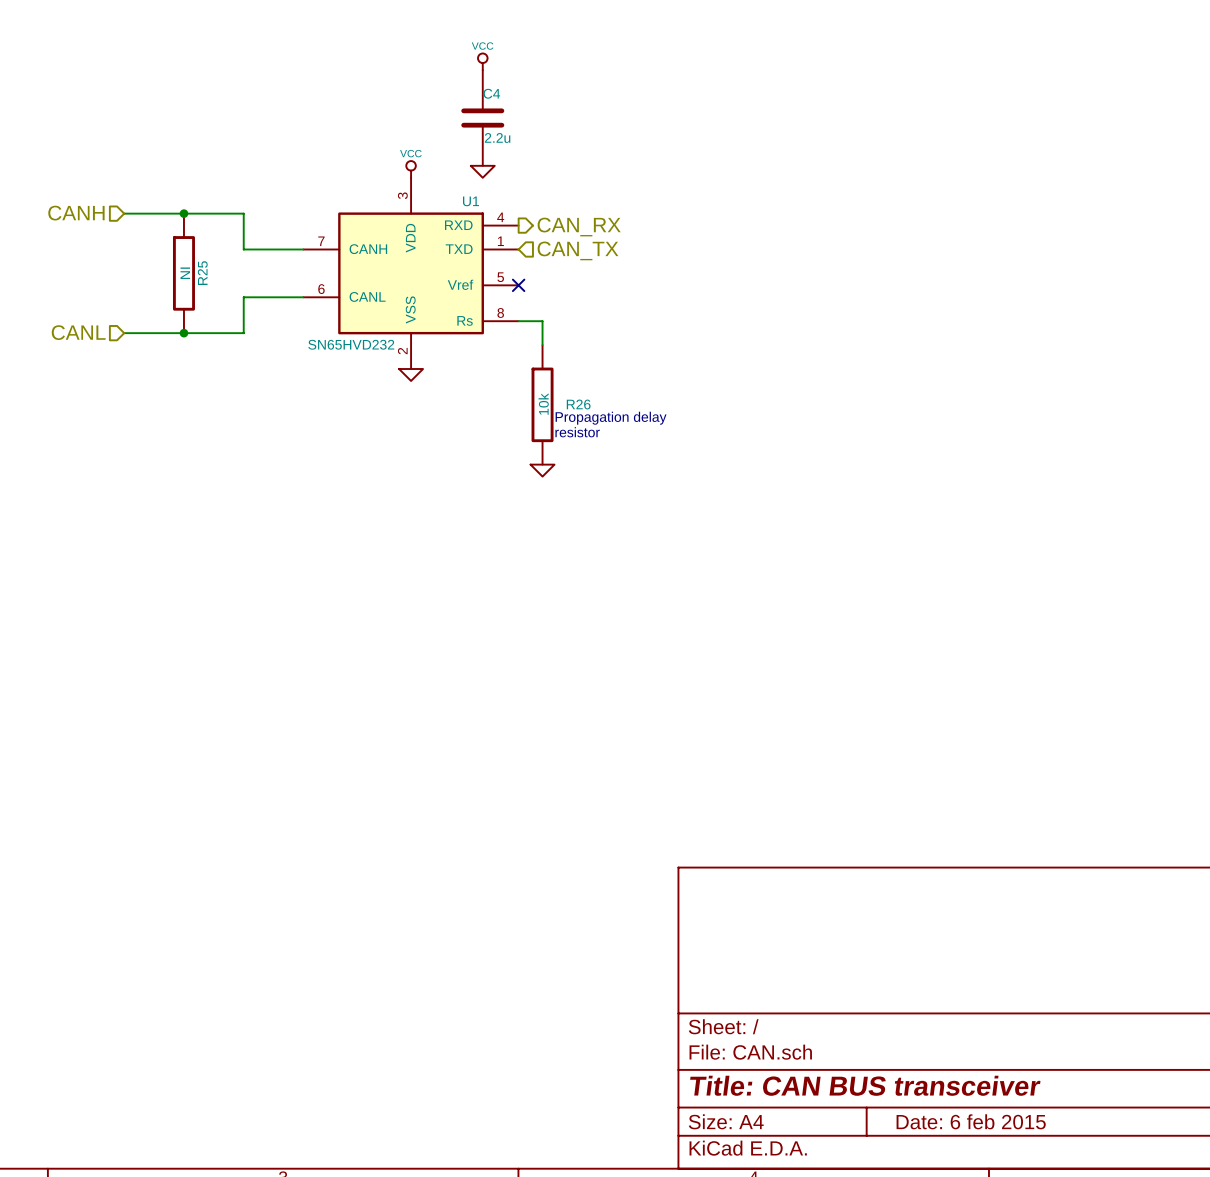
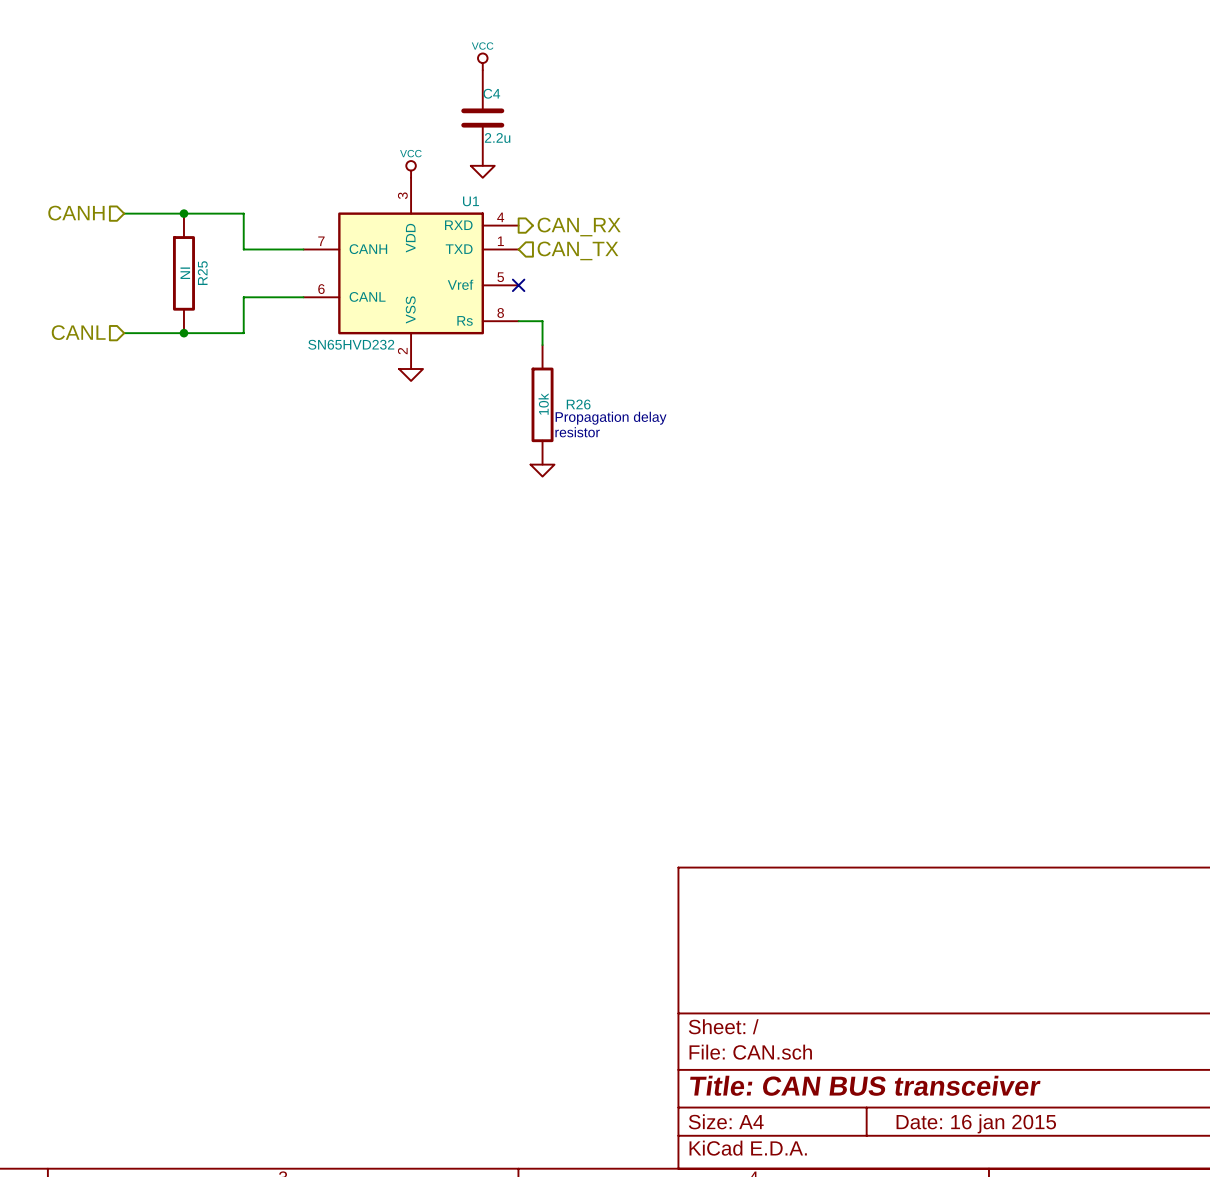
title block: Date: 6 feb 2015 (971, 1121) -> Date: 16 jan 2015 (976, 1123)

